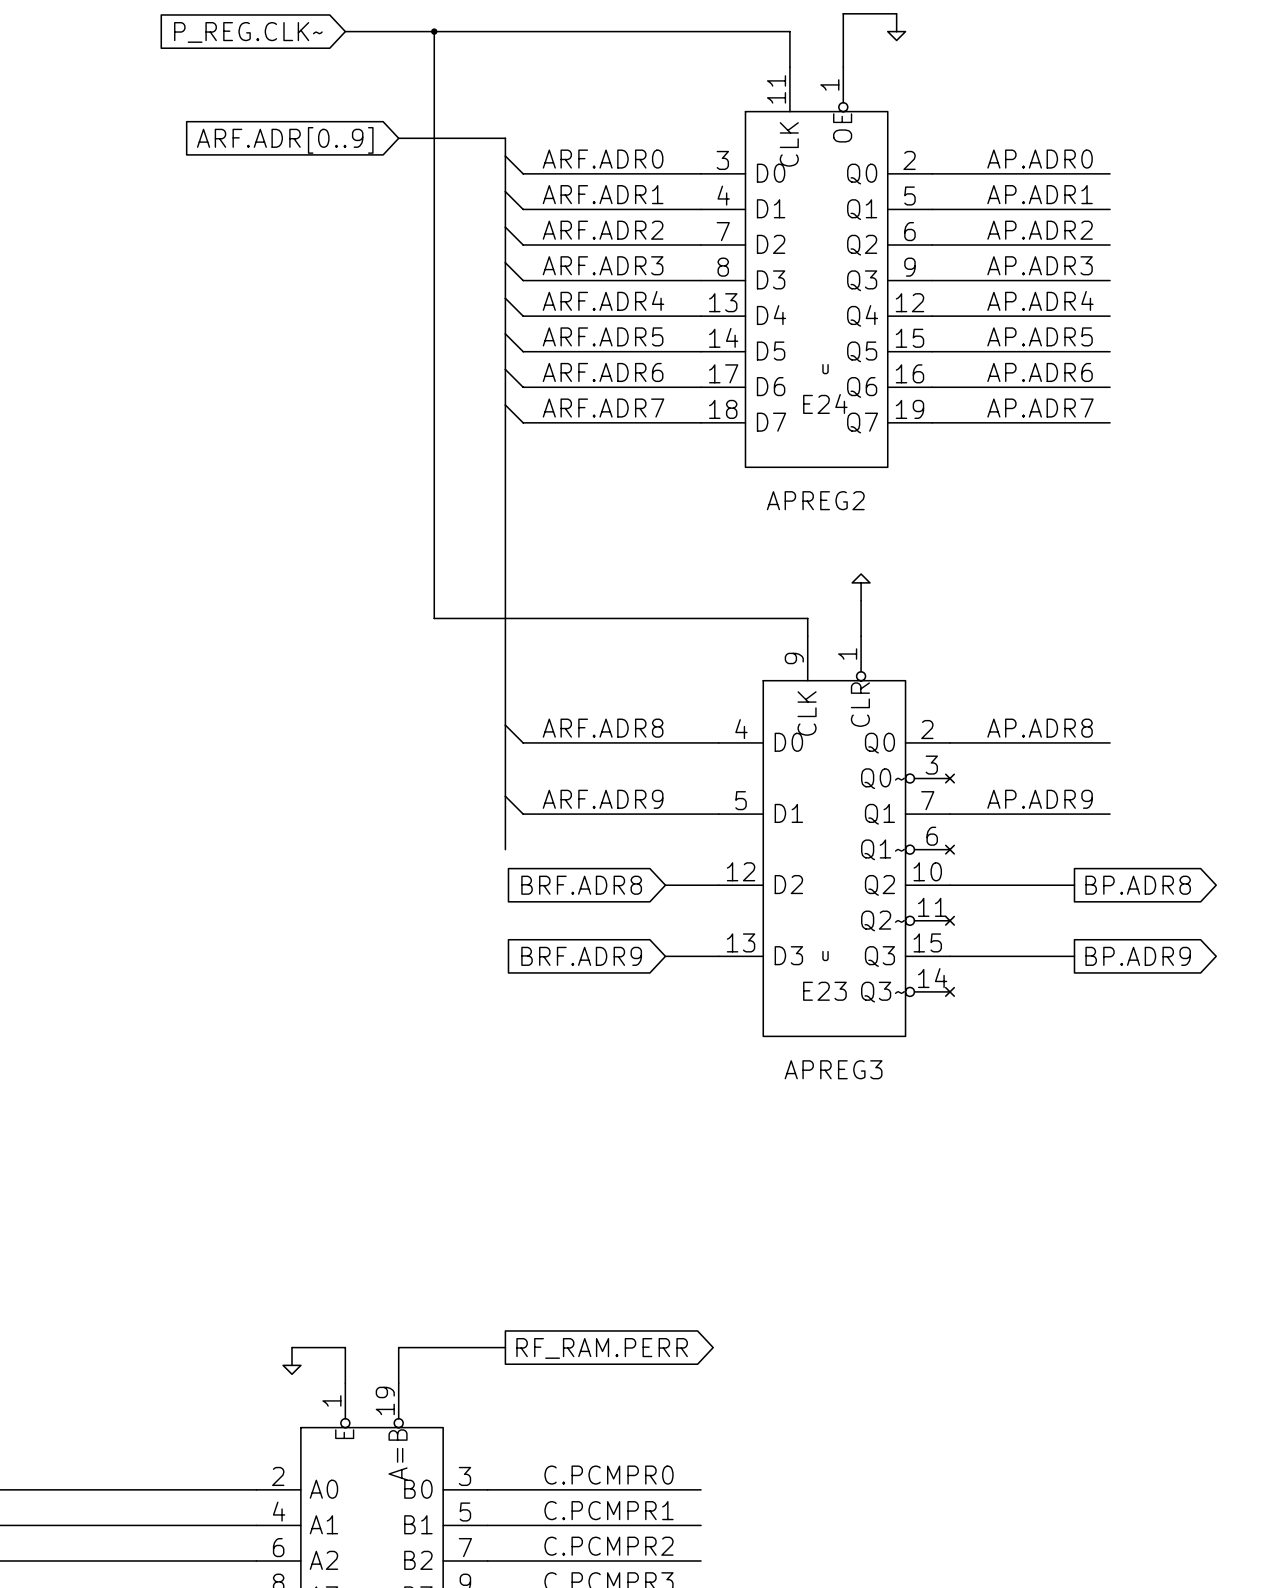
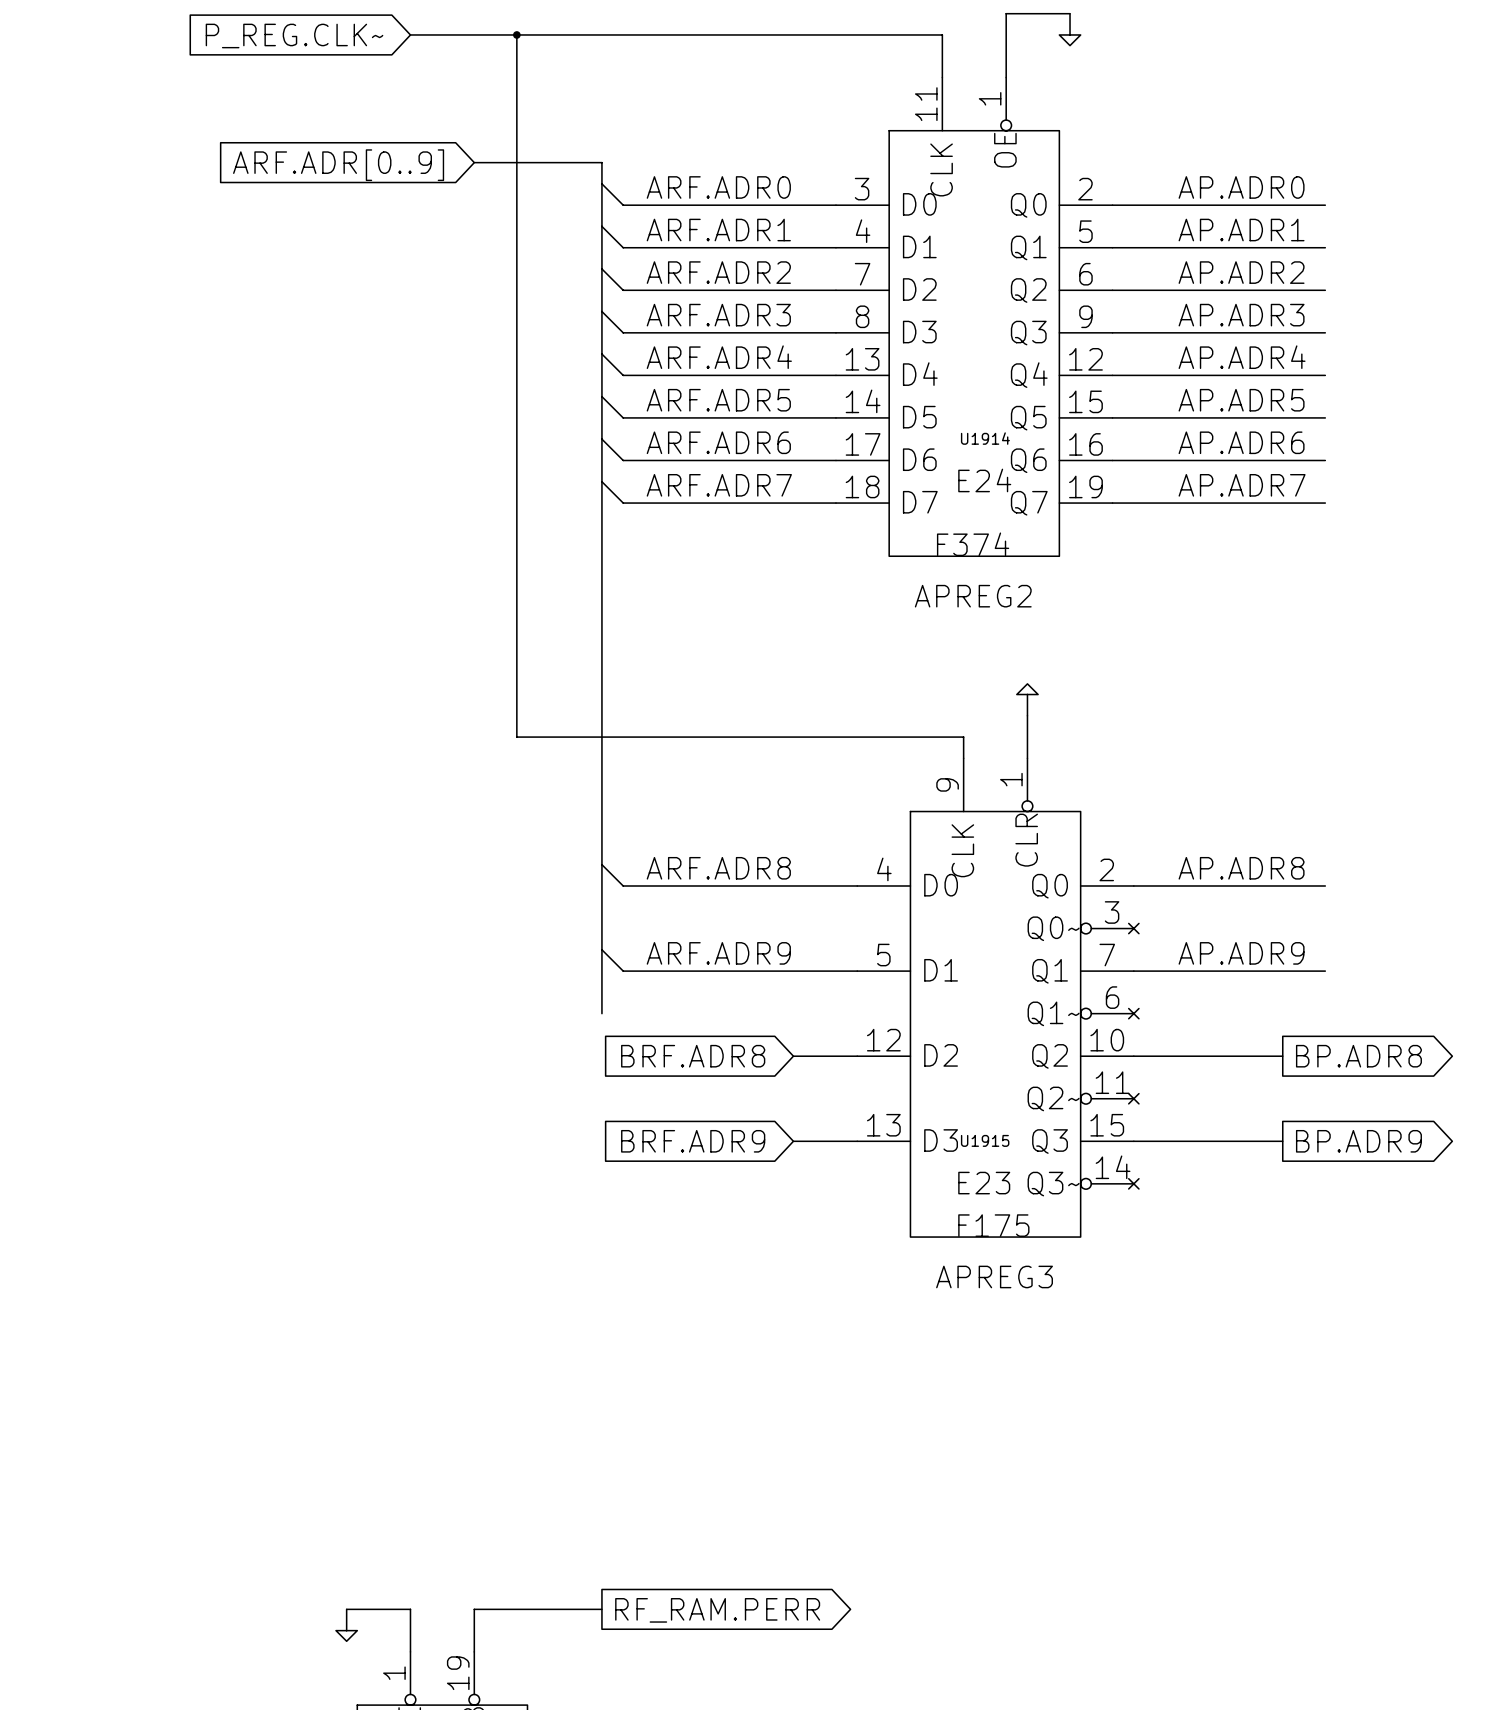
U name: U (825, 369) -> U1914 (985, 438)
U value: none -> F374 (973, 544)
U name: U (825, 956) -> U1915 (985, 1140)
U value: none -> F175 (993, 1225)

